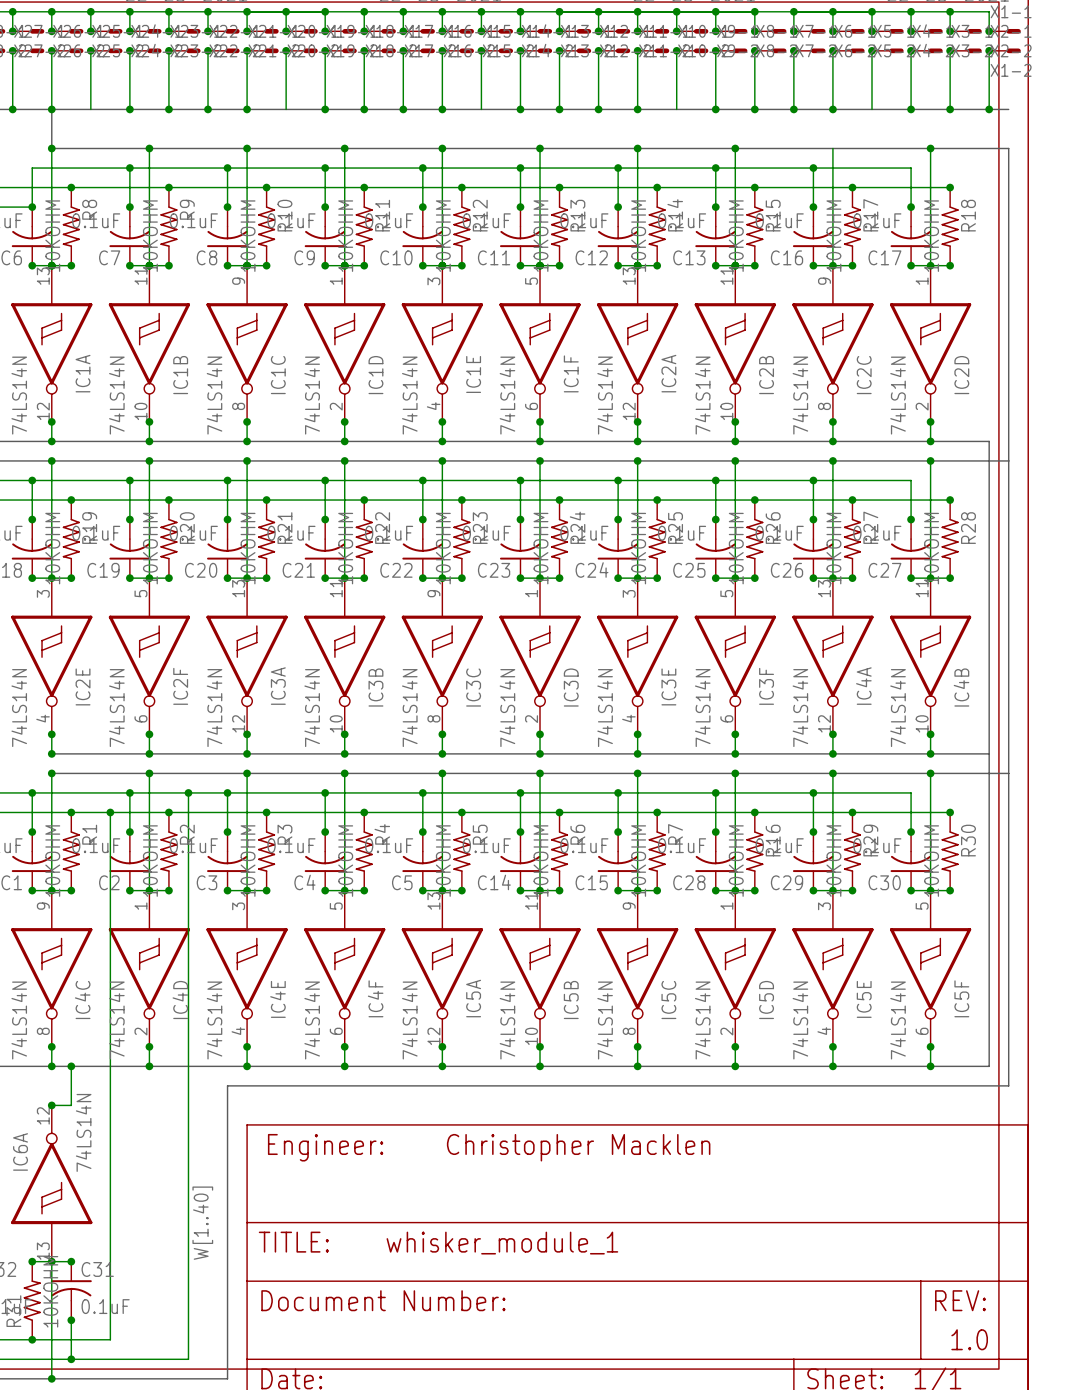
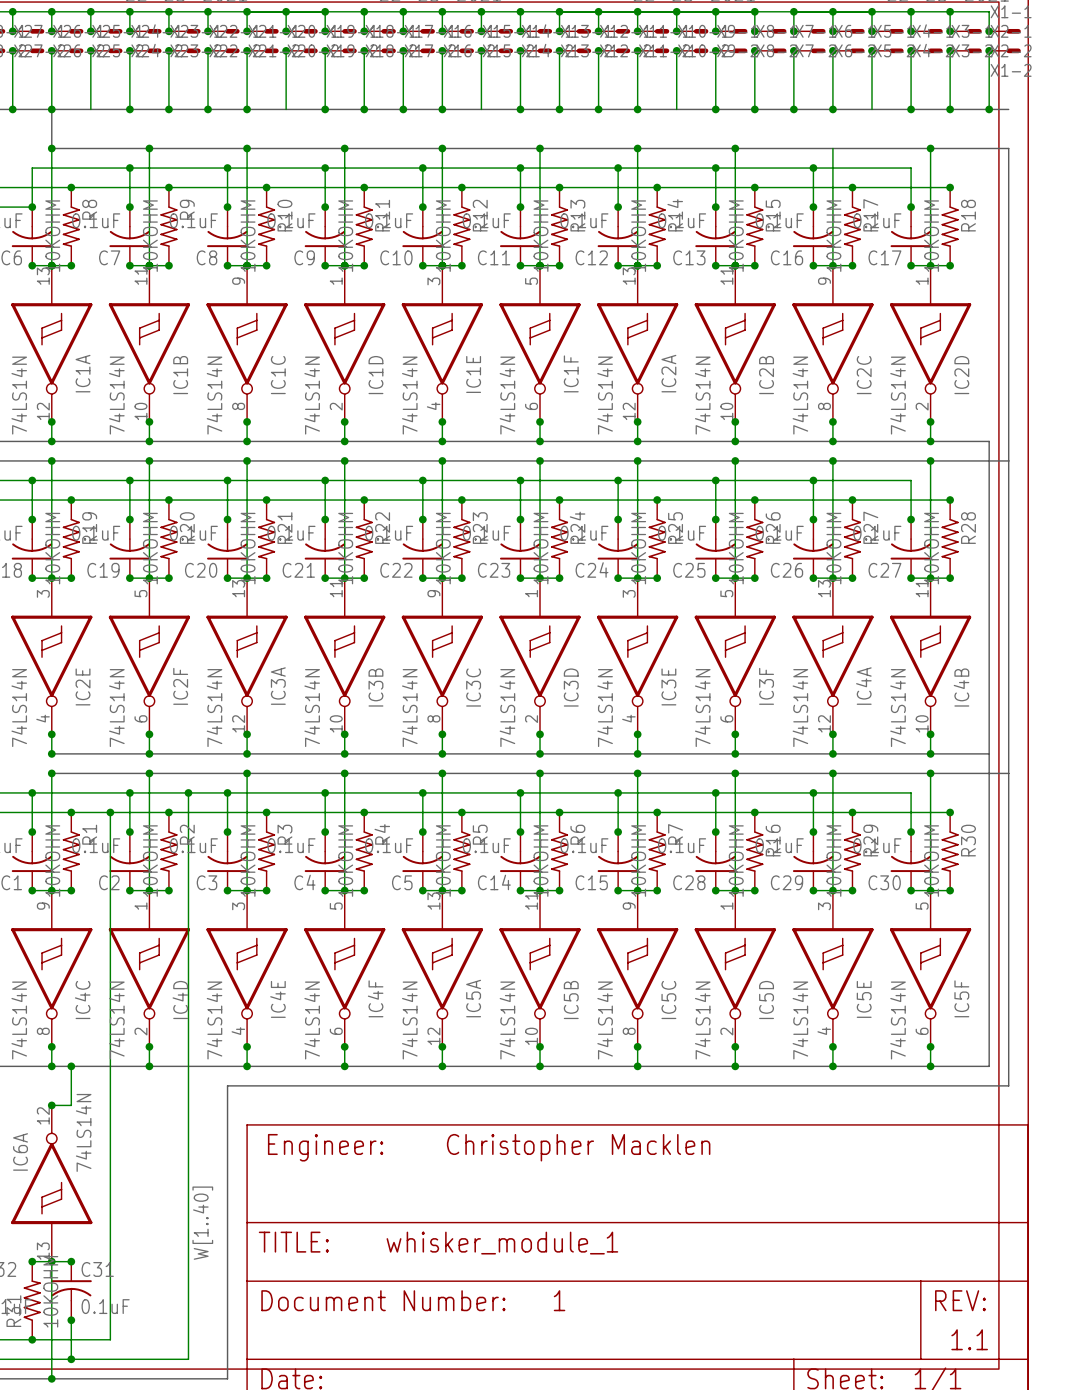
text: none -> 1 (559, 1300)
text: 1.0 (969, 1339) -> 1.1 (969, 1339)

